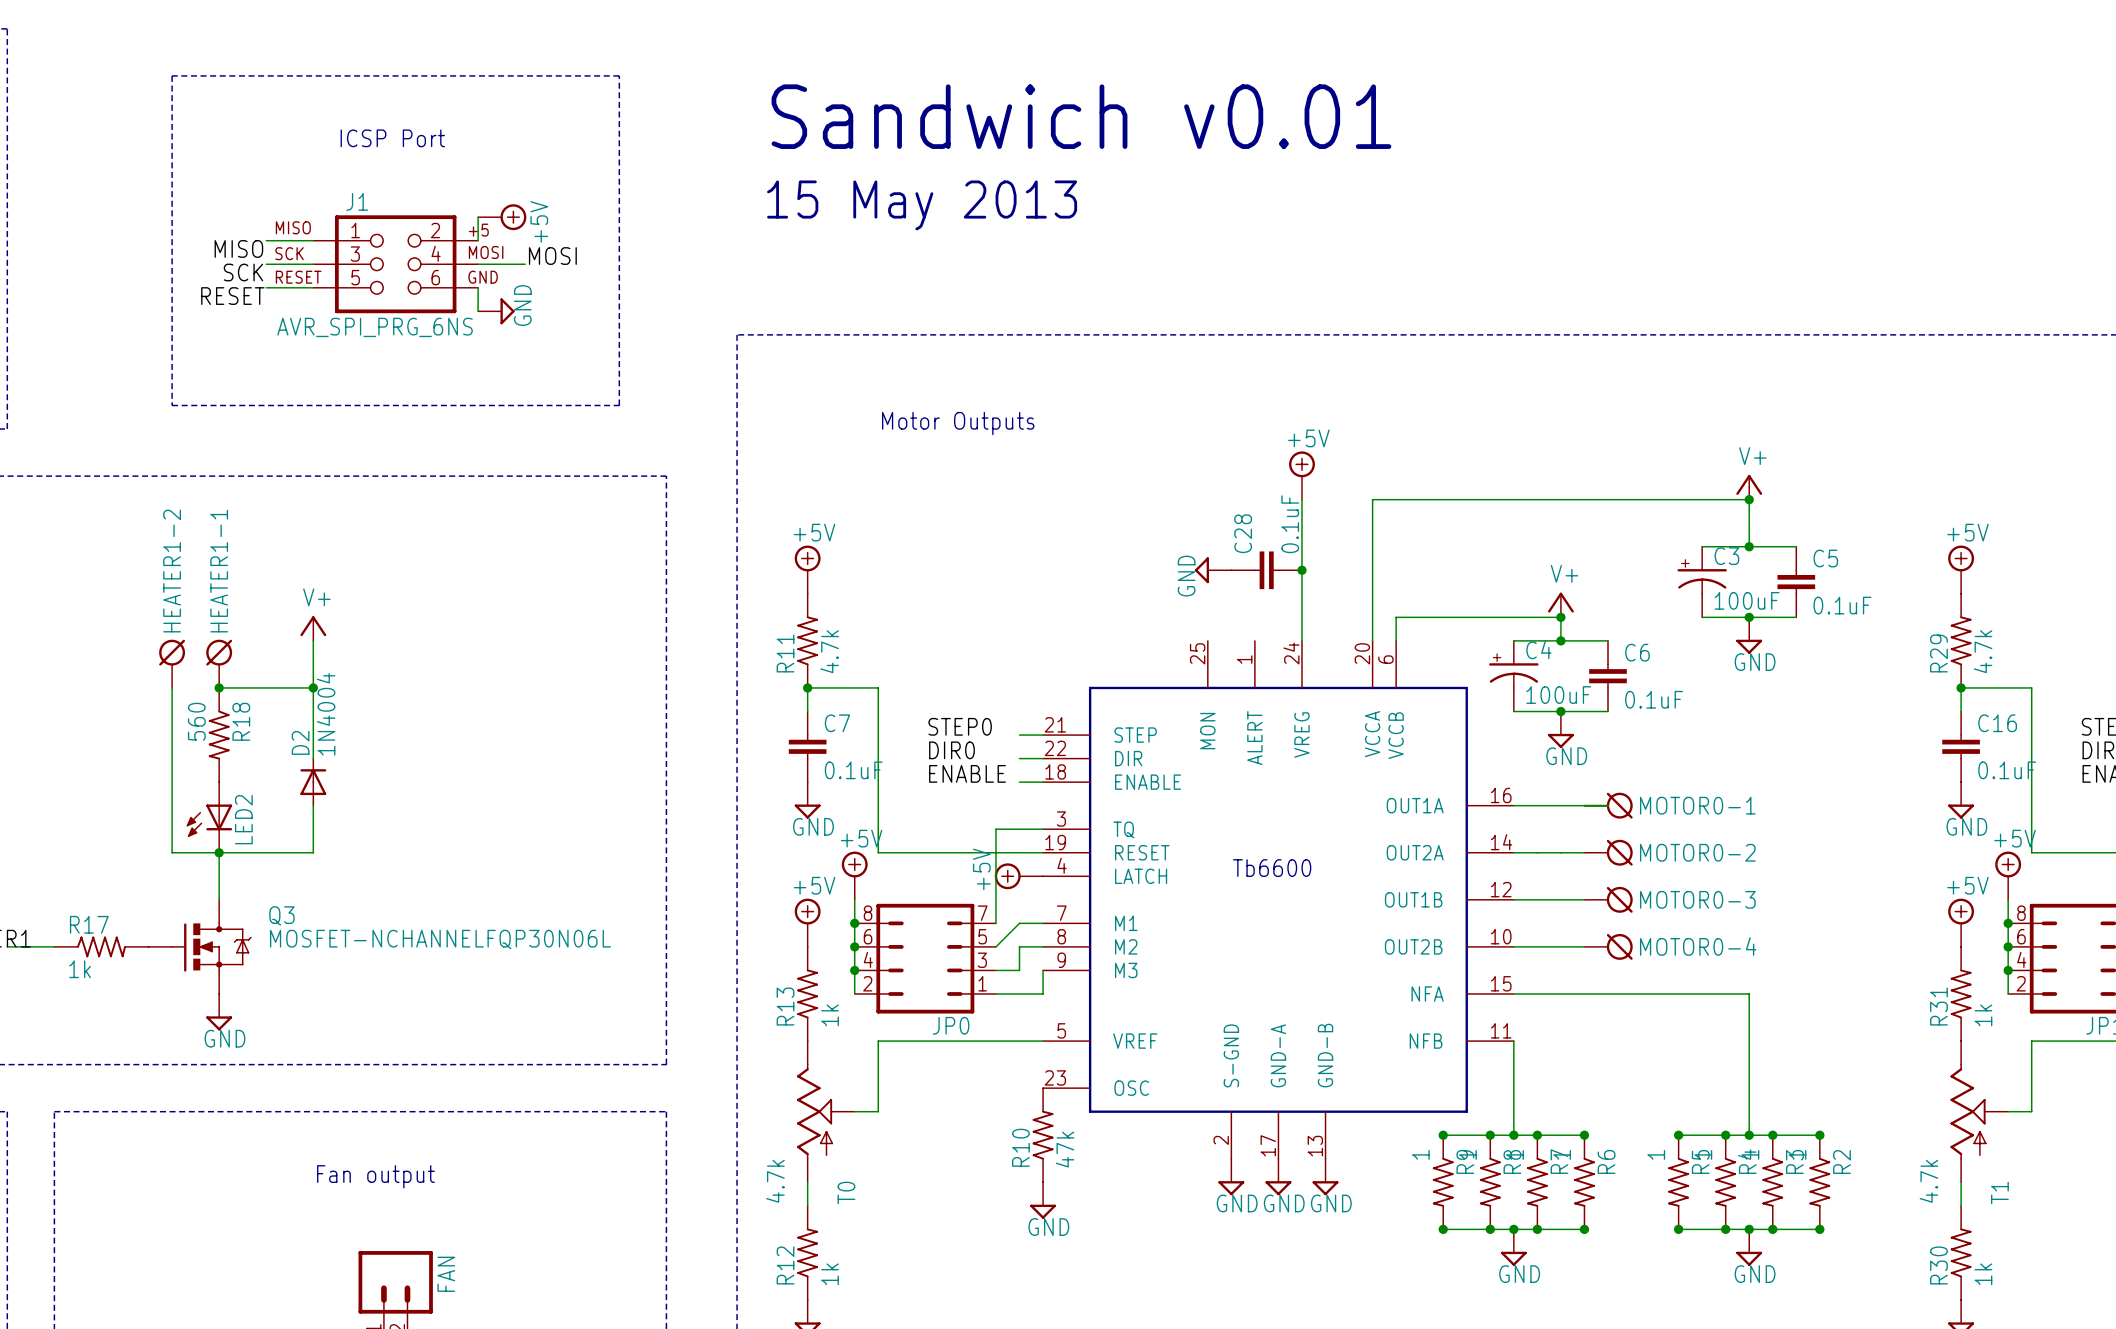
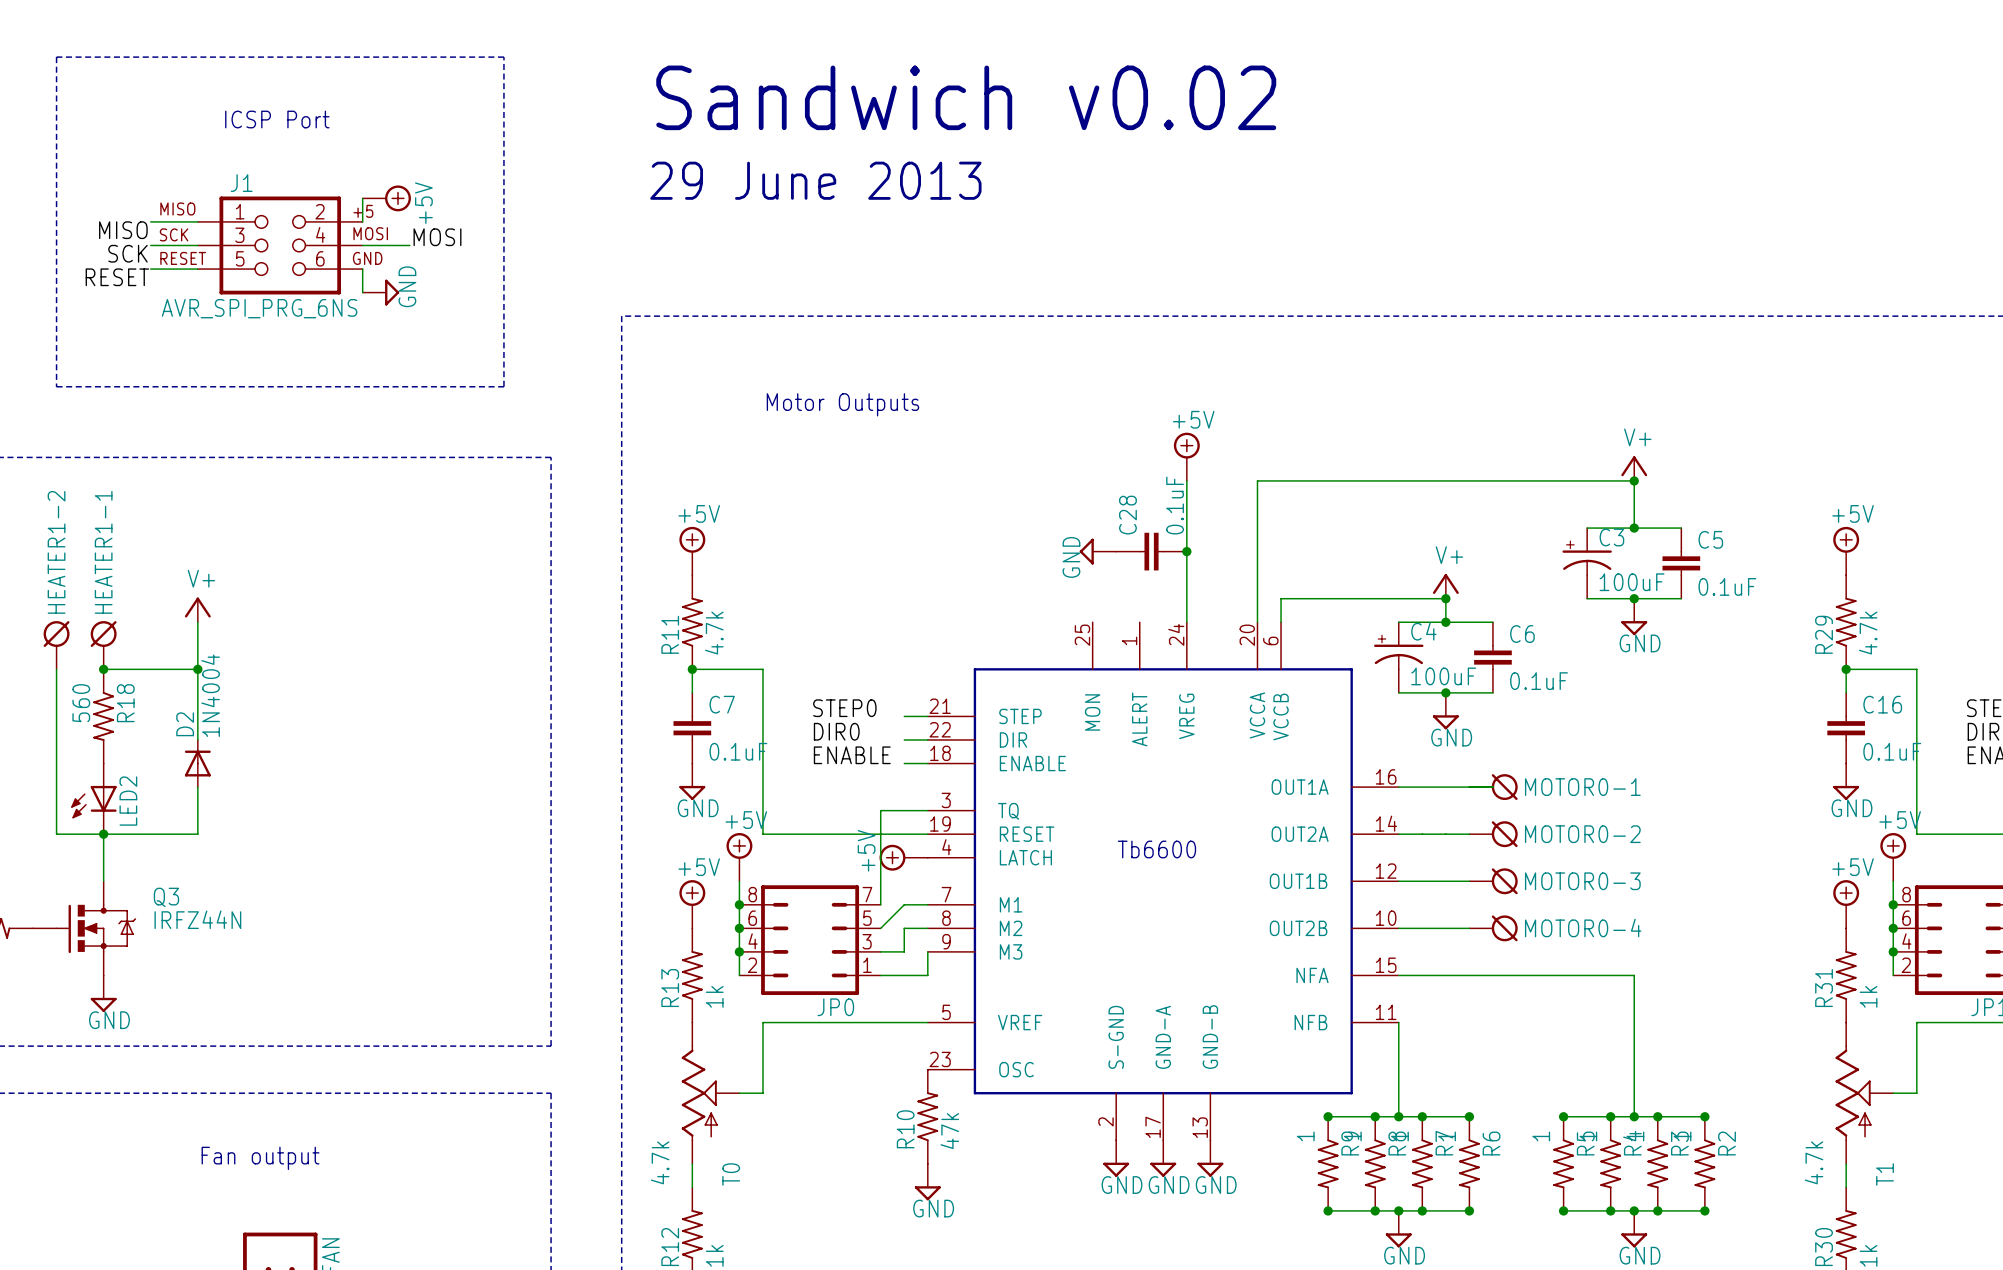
text: Sandwich v0.01 (1081, 116) -> Sandwich v0.02 (966, 97)
text: 15 May 2013 (922, 205) -> 29 June 2013 (815, 180)
Q3 value: MOSFET-NCHANNELFQP30N06L (440, 939) -> IRFZ44N (197, 919)

